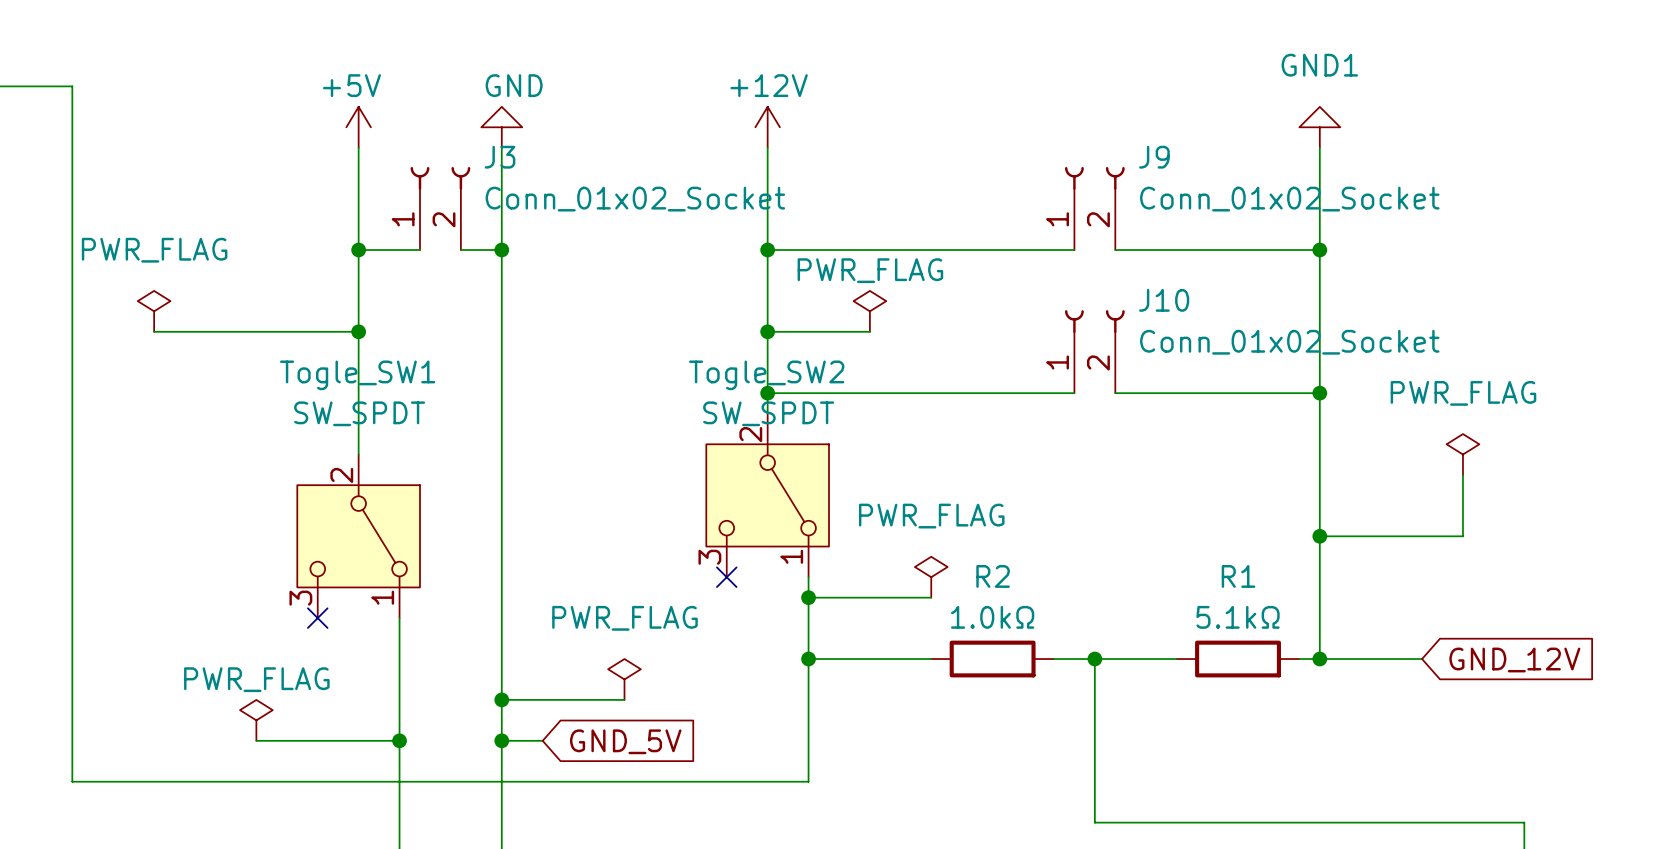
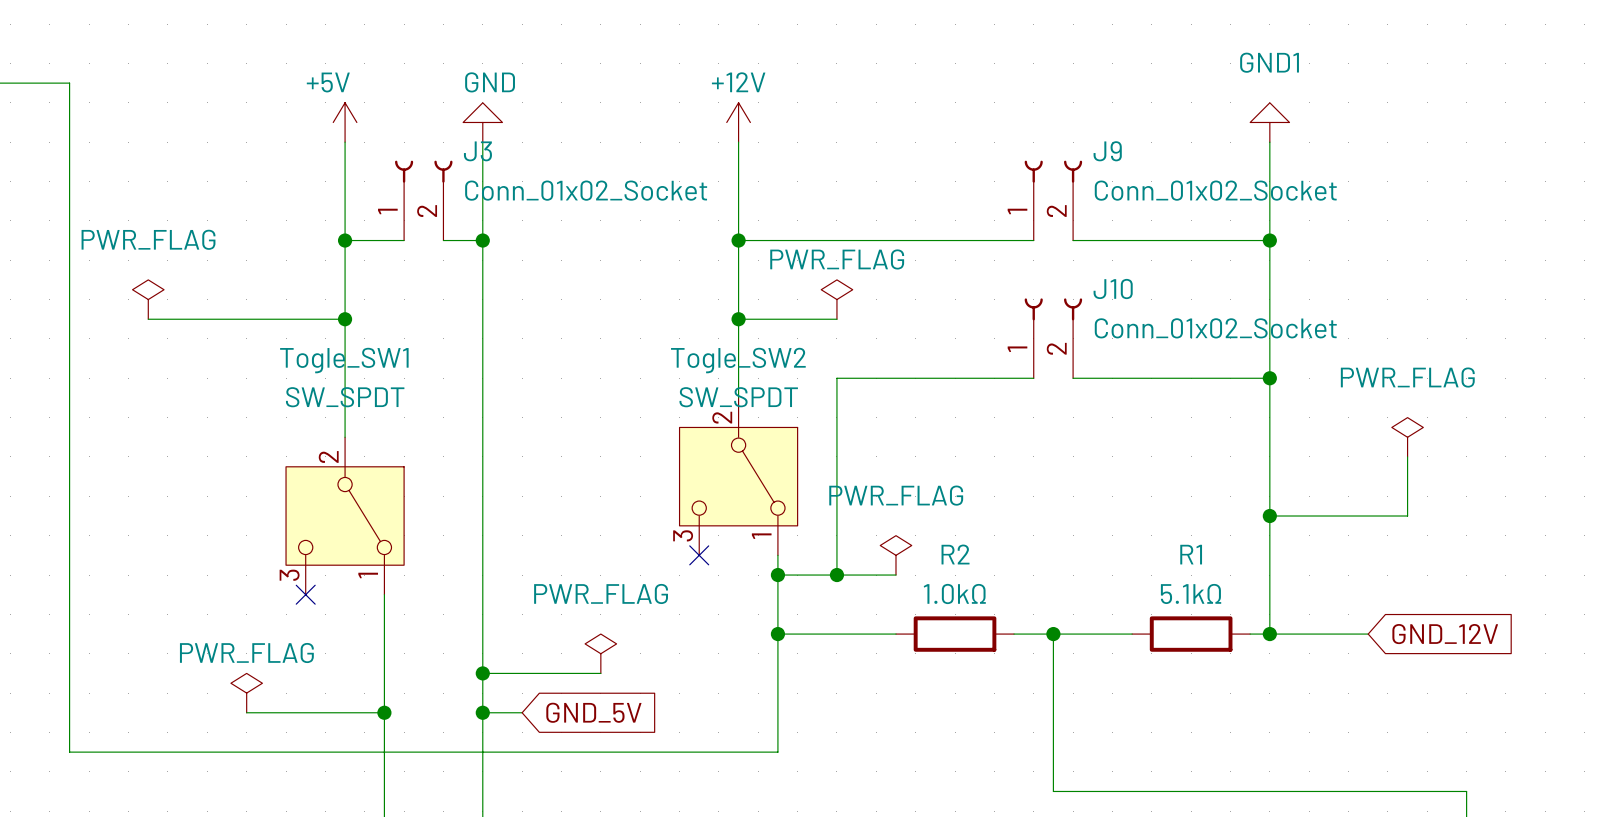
wire: (767, 393) (869, 393) -> (836, 575) (836, 378)
junction: (767, 393) -> none
junction: none -> (836, 575)

